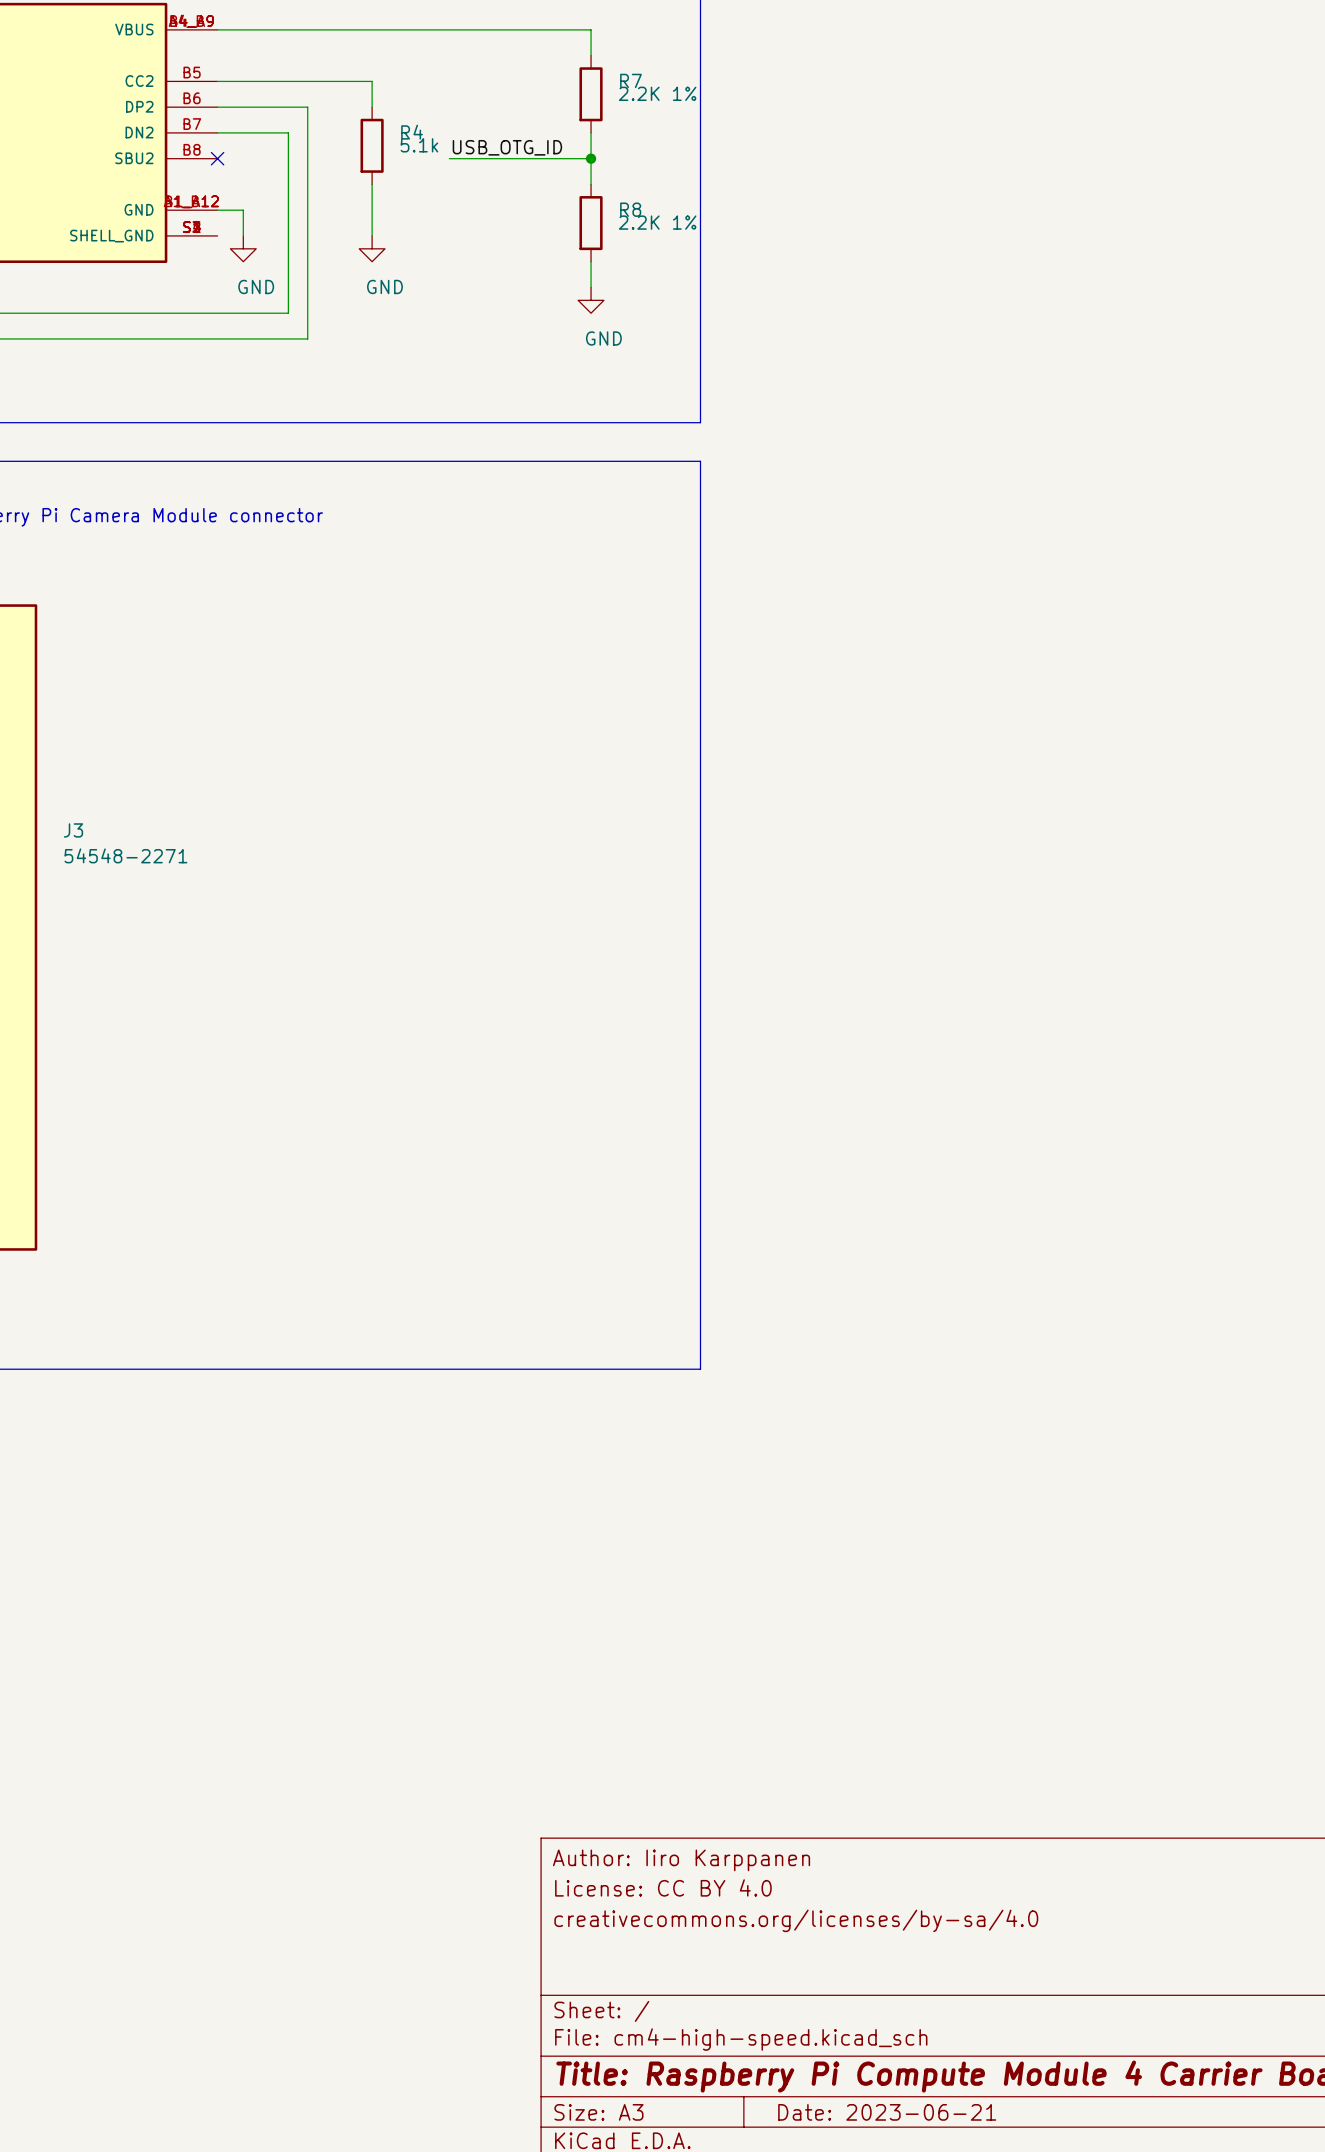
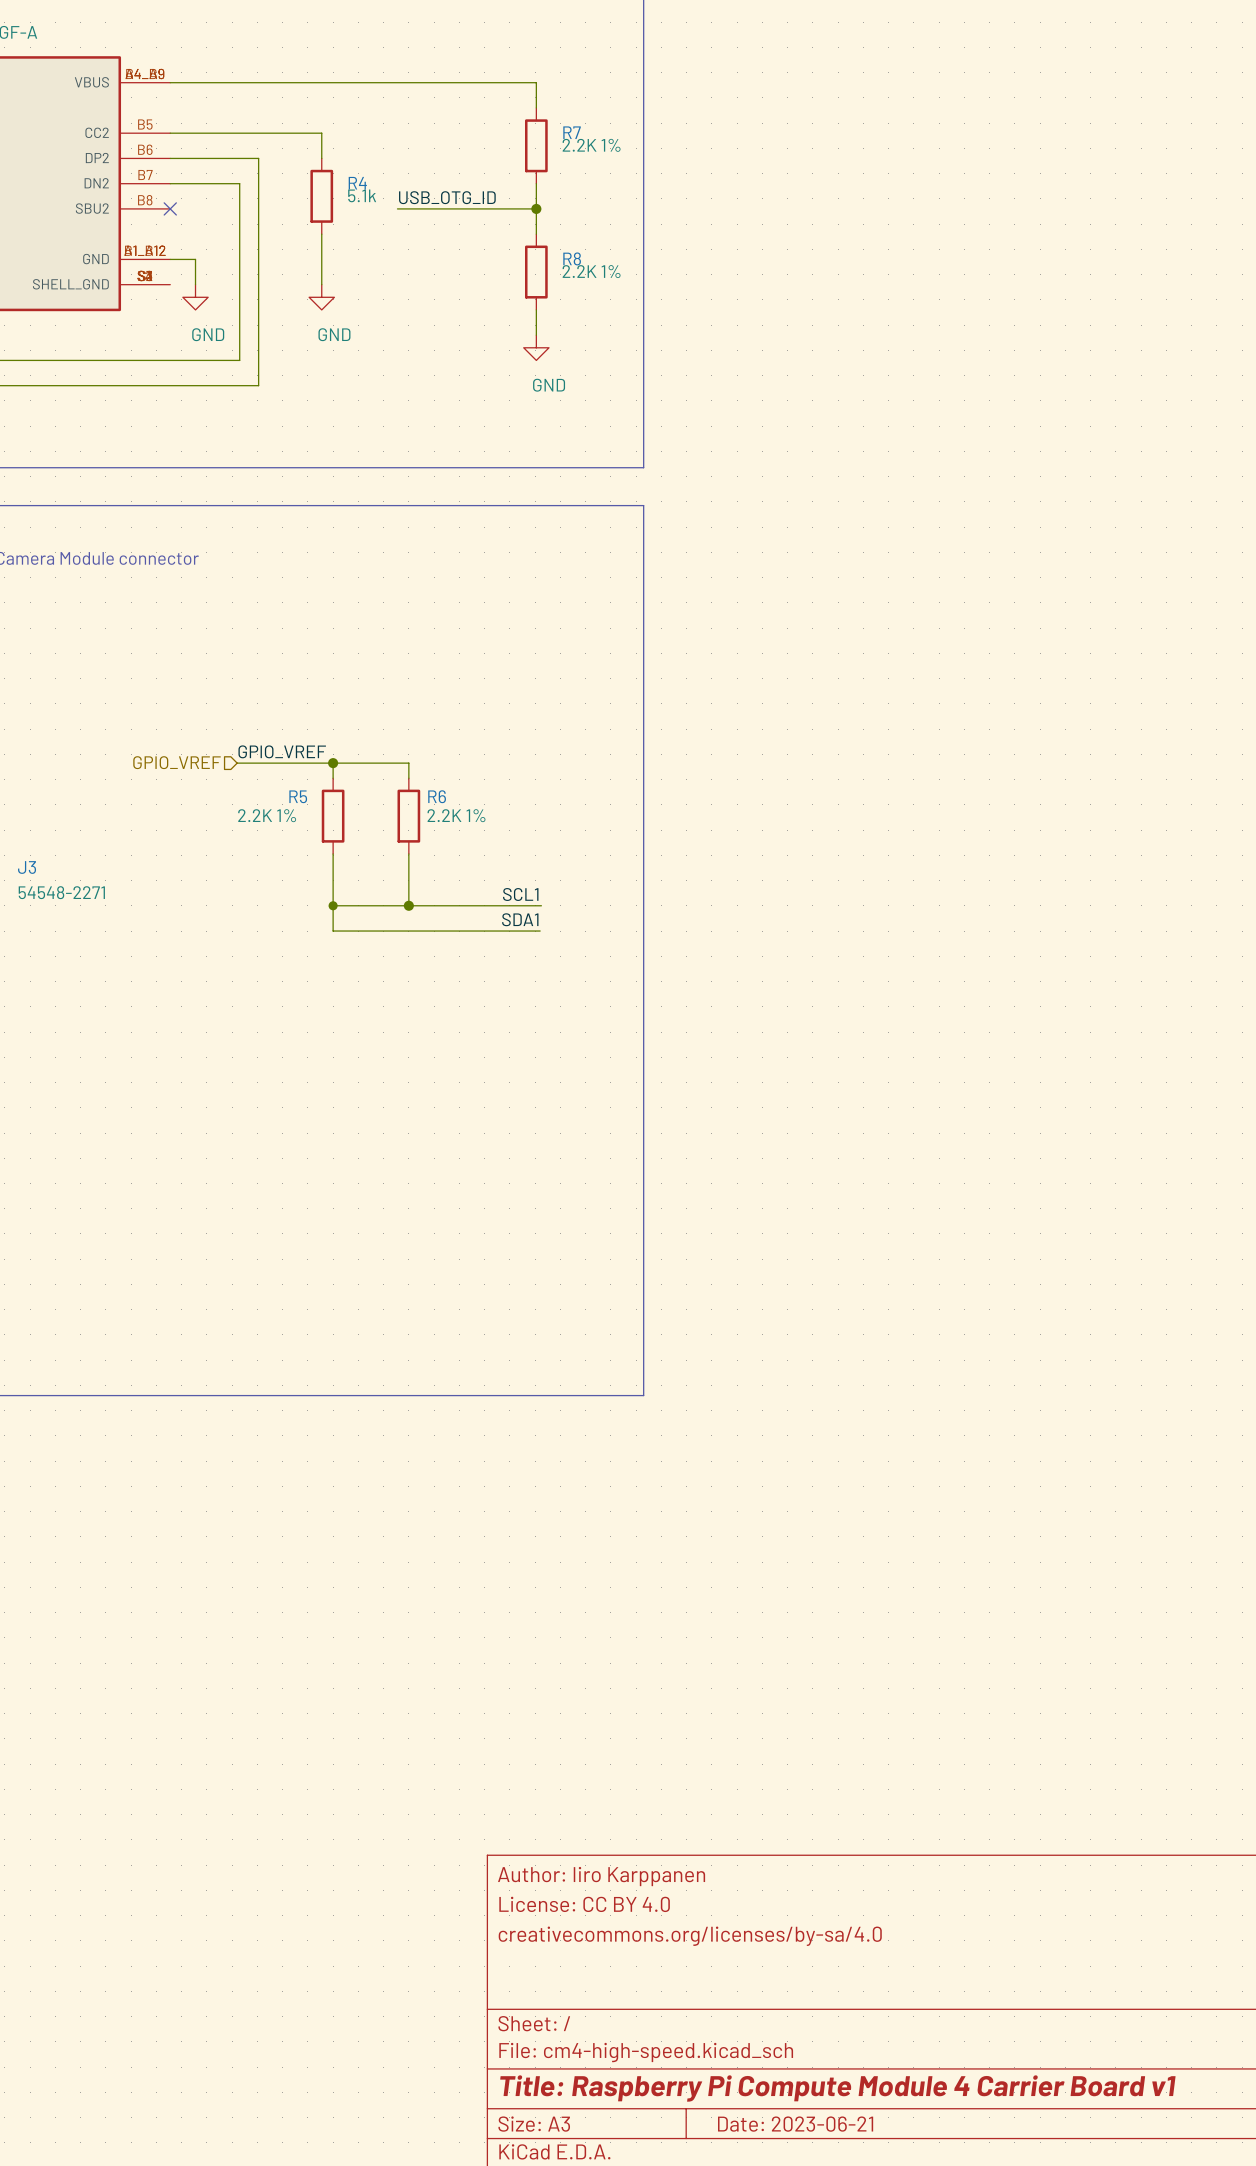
label: none -> GPIO_VREF (282, 751)
hierarchical label: none -> GPIO_VREF (177, 762)
wire: none -> (237, 763) (408, 763) (408, 778)
wire: none -> (333, 763) (333, 778)
junction: none -> (333, 763)
R5: none -> 2.2K 1% (333, 816)
R6: none -> 2.2K 1% (408, 816)
wire: none -> (333, 854) (333, 931) (540, 931)
wire: none -> (408, 854) (408, 905)
label: none -> SCL1 (520, 894)
wire: none -> (333, 905) (541, 905)
junction: none -> (333, 905)
junction: none -> (408, 905)
label: none -> SDA1 (520, 919)

